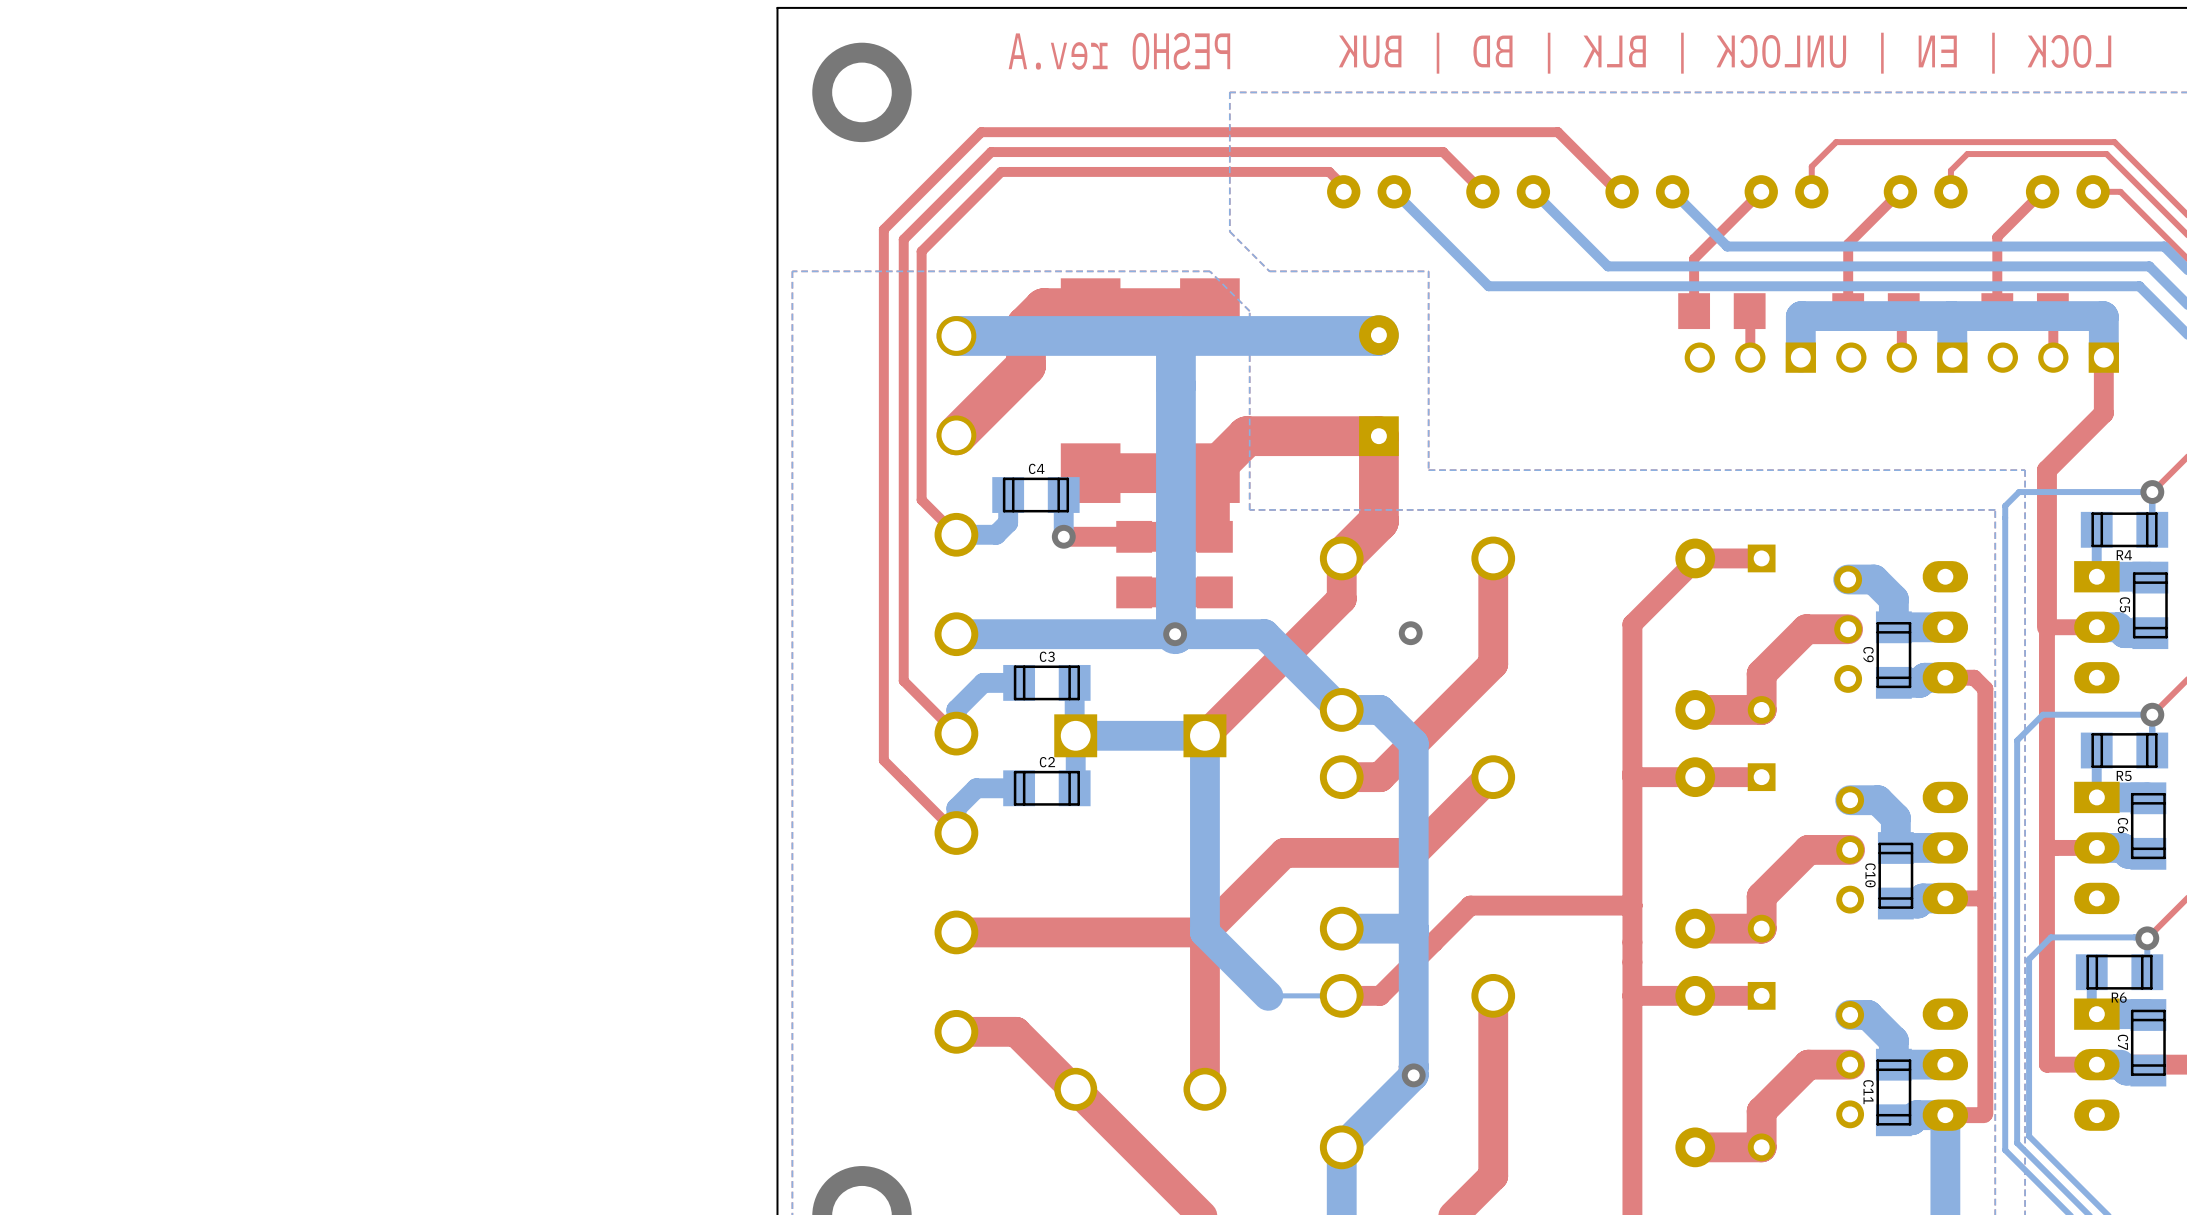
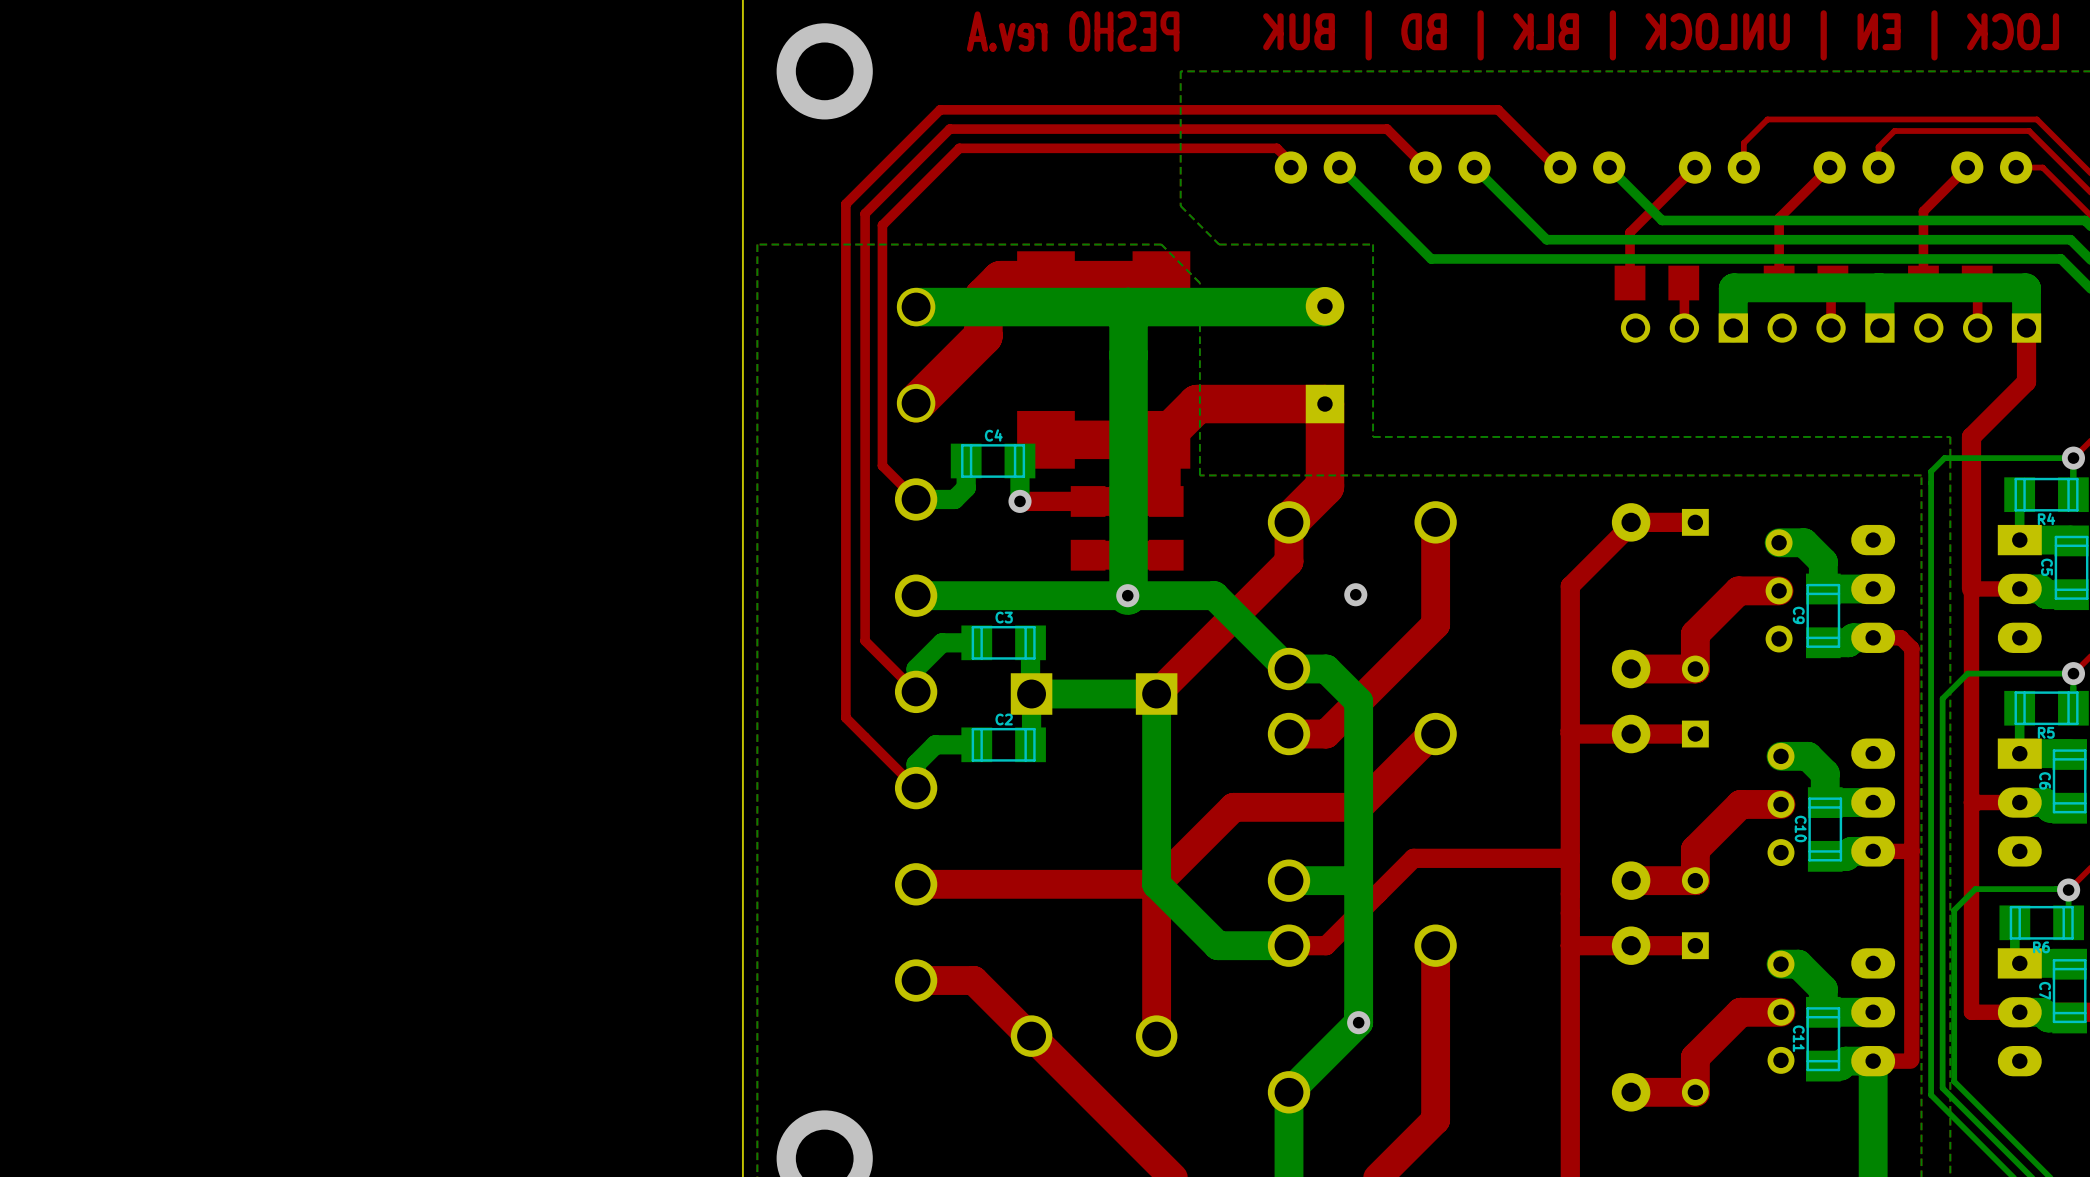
bottom track width: thin (1341, 995) (1268, 995) -> thick (1289, 945) (1218, 945)

